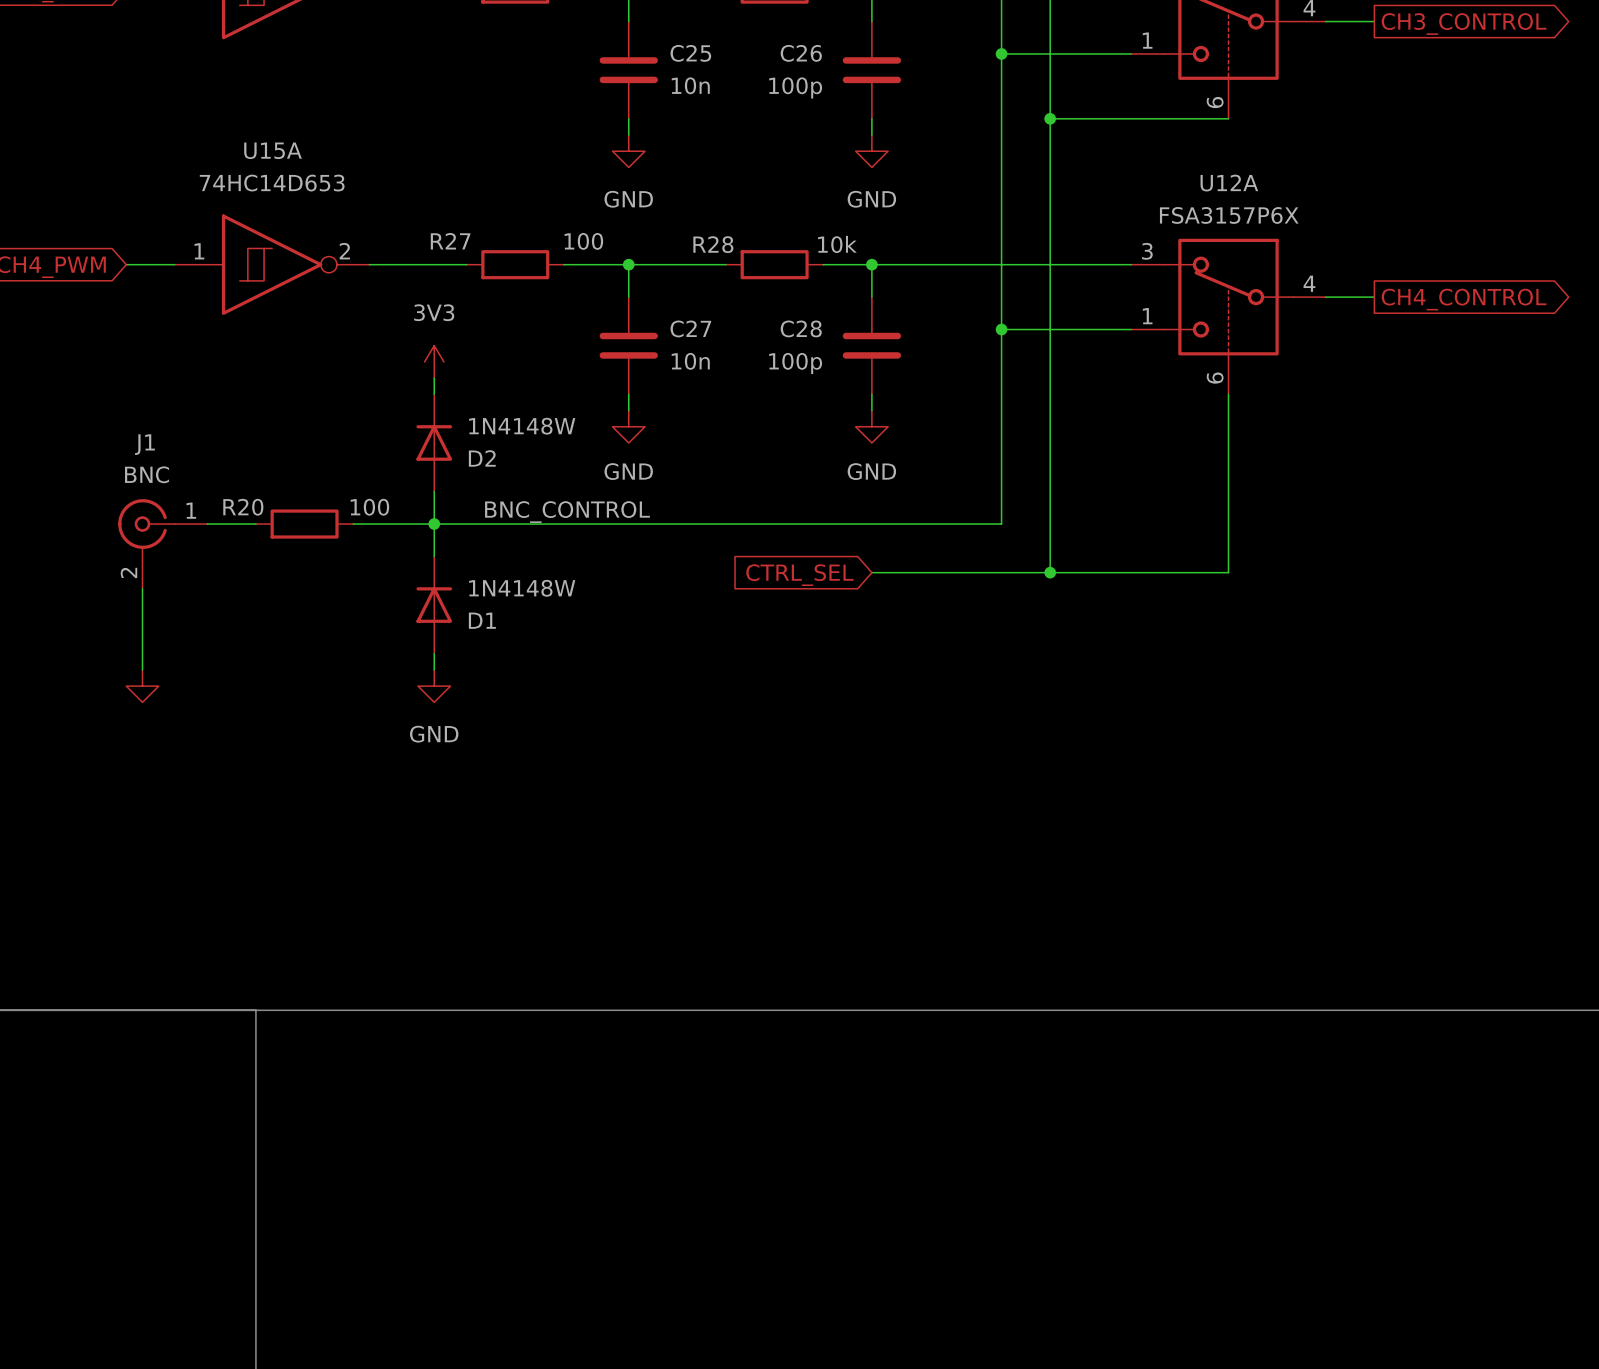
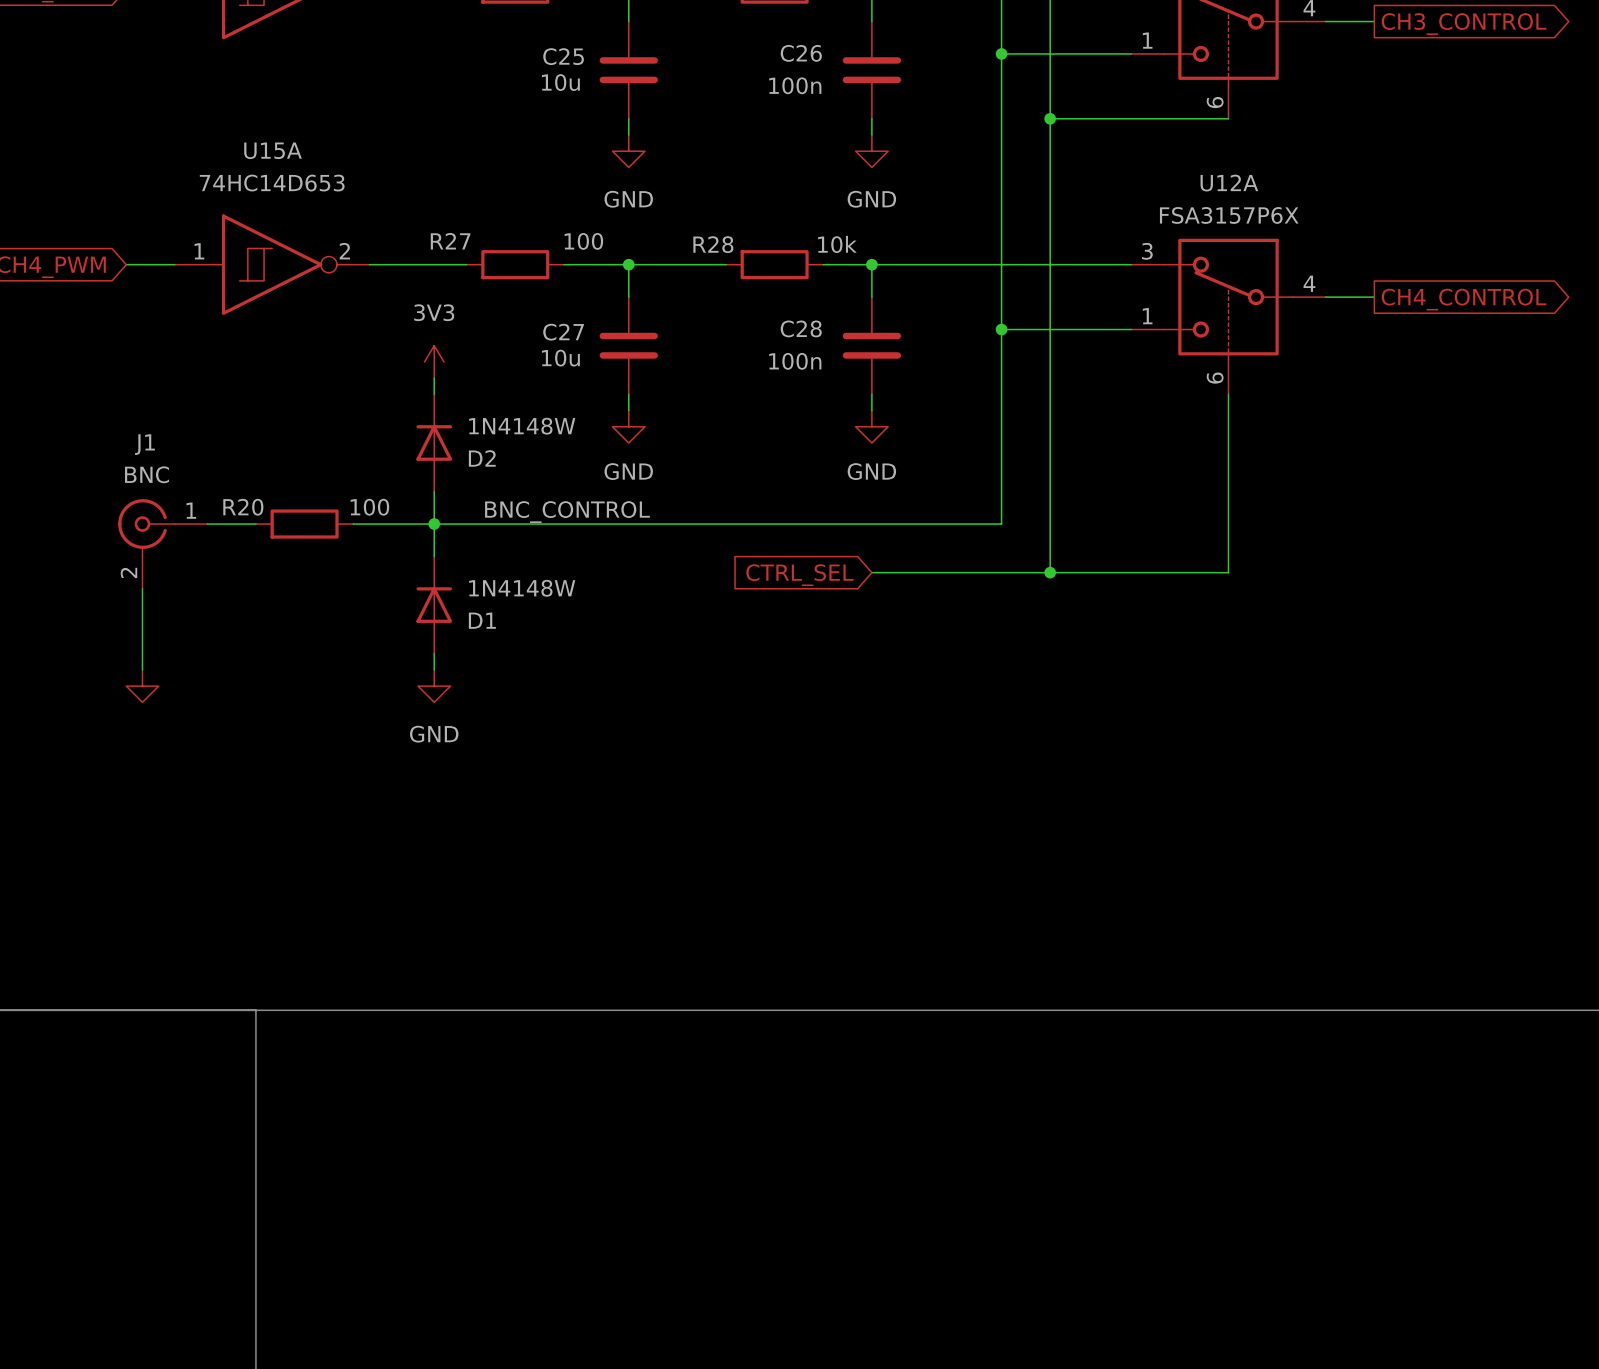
C25 name position: C25 (690, 53) -> C25 (563, 56)
C25 value: 10n (690, 85) -> 10u (560, 82)
C26 value: 100p (795, 87) -> 100n (795, 85)
C27 name position: C27 (690, 328) -> C27 (563, 332)
C27 value: 10n (690, 361) -> 10u (560, 358)
C28 value: 100p (795, 363) -> 100n (795, 361)

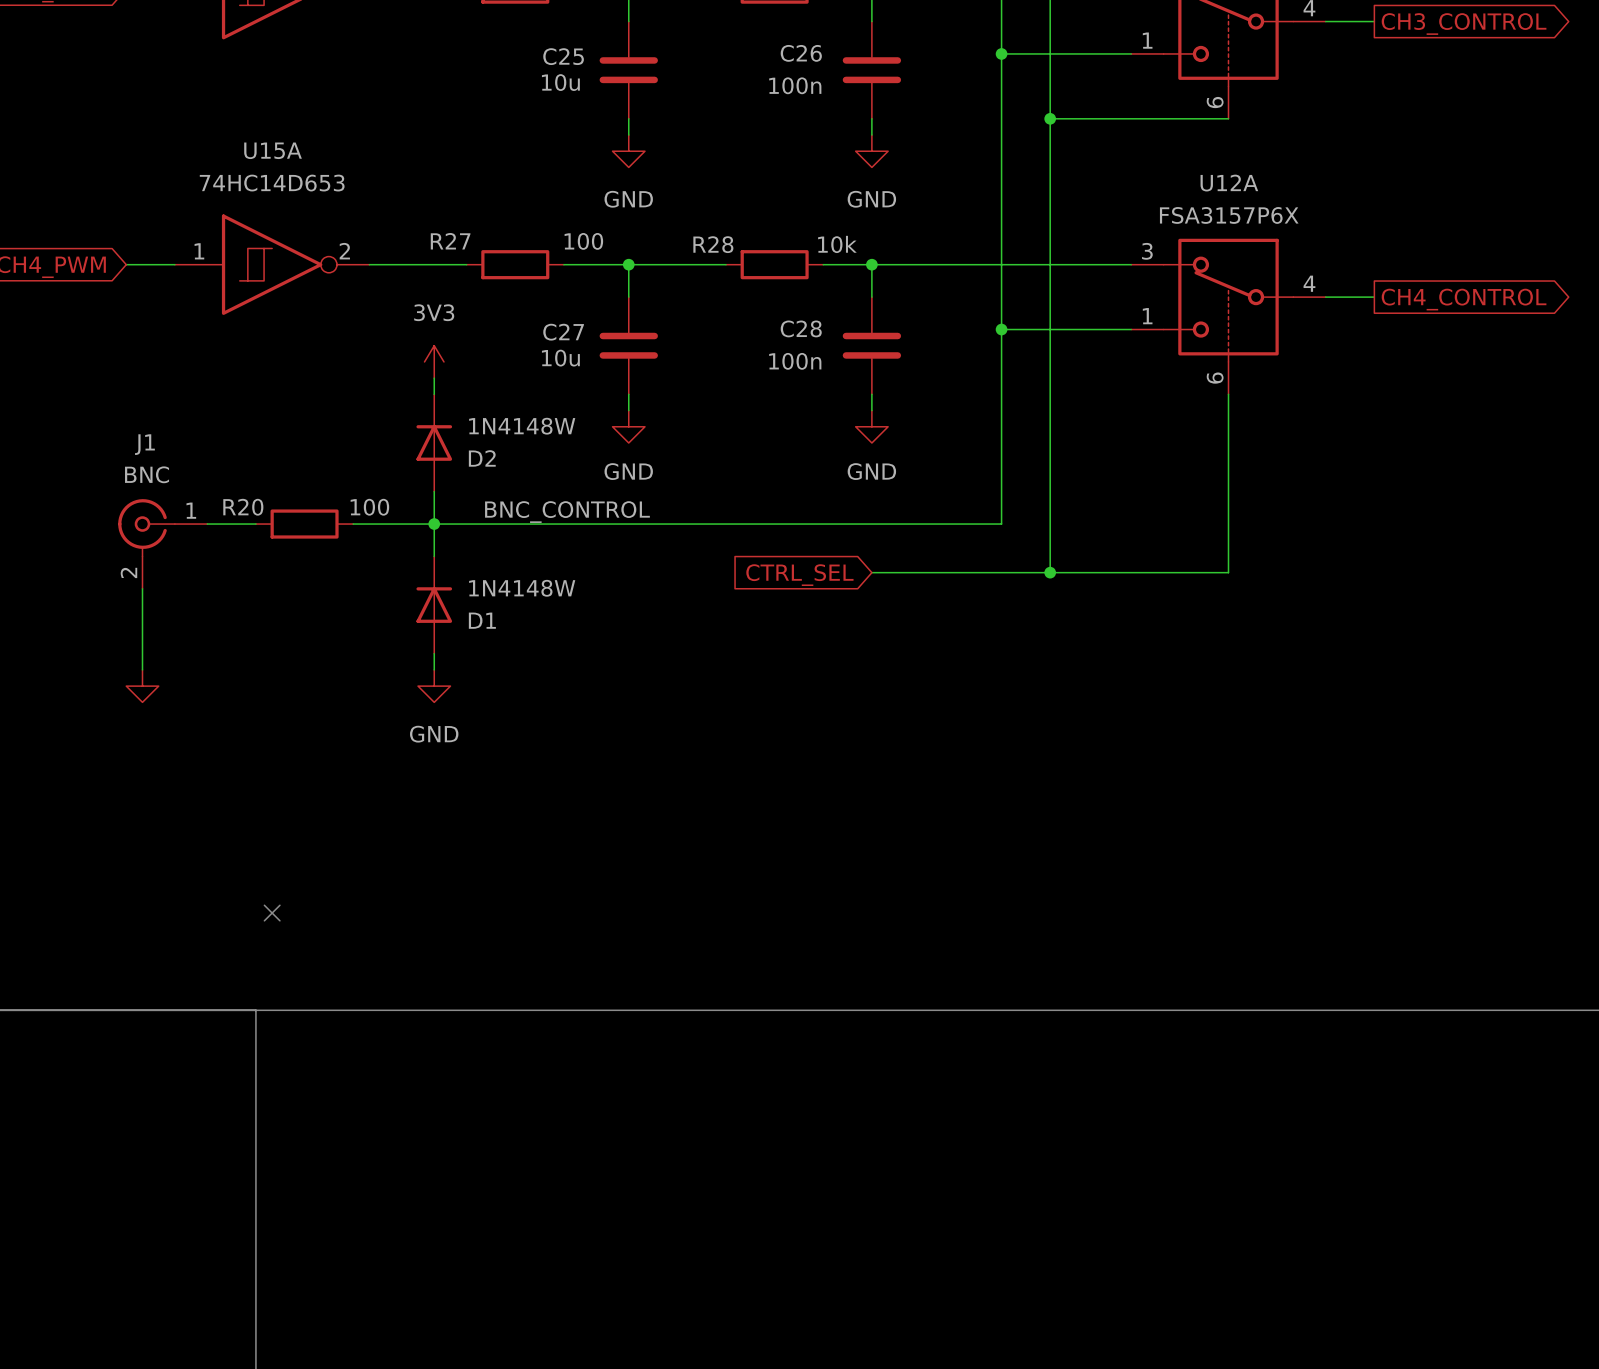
no-connect mark: none -> (272, 913)

